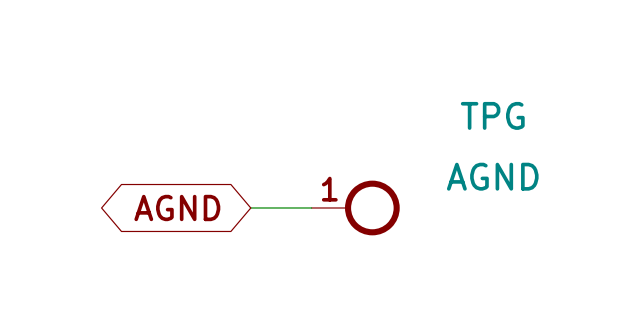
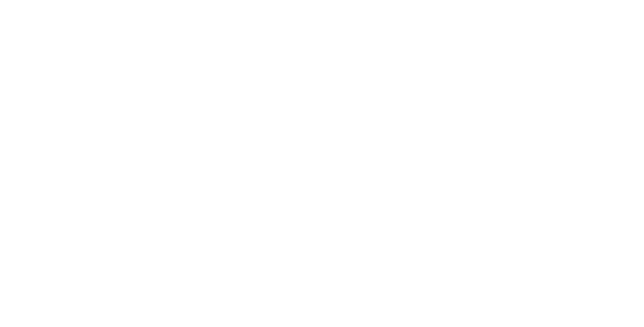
global label: AGND (177, 207) -> none
wire: (250, 207) (311, 207) -> none
TPG: AGND (355, 207) -> none

